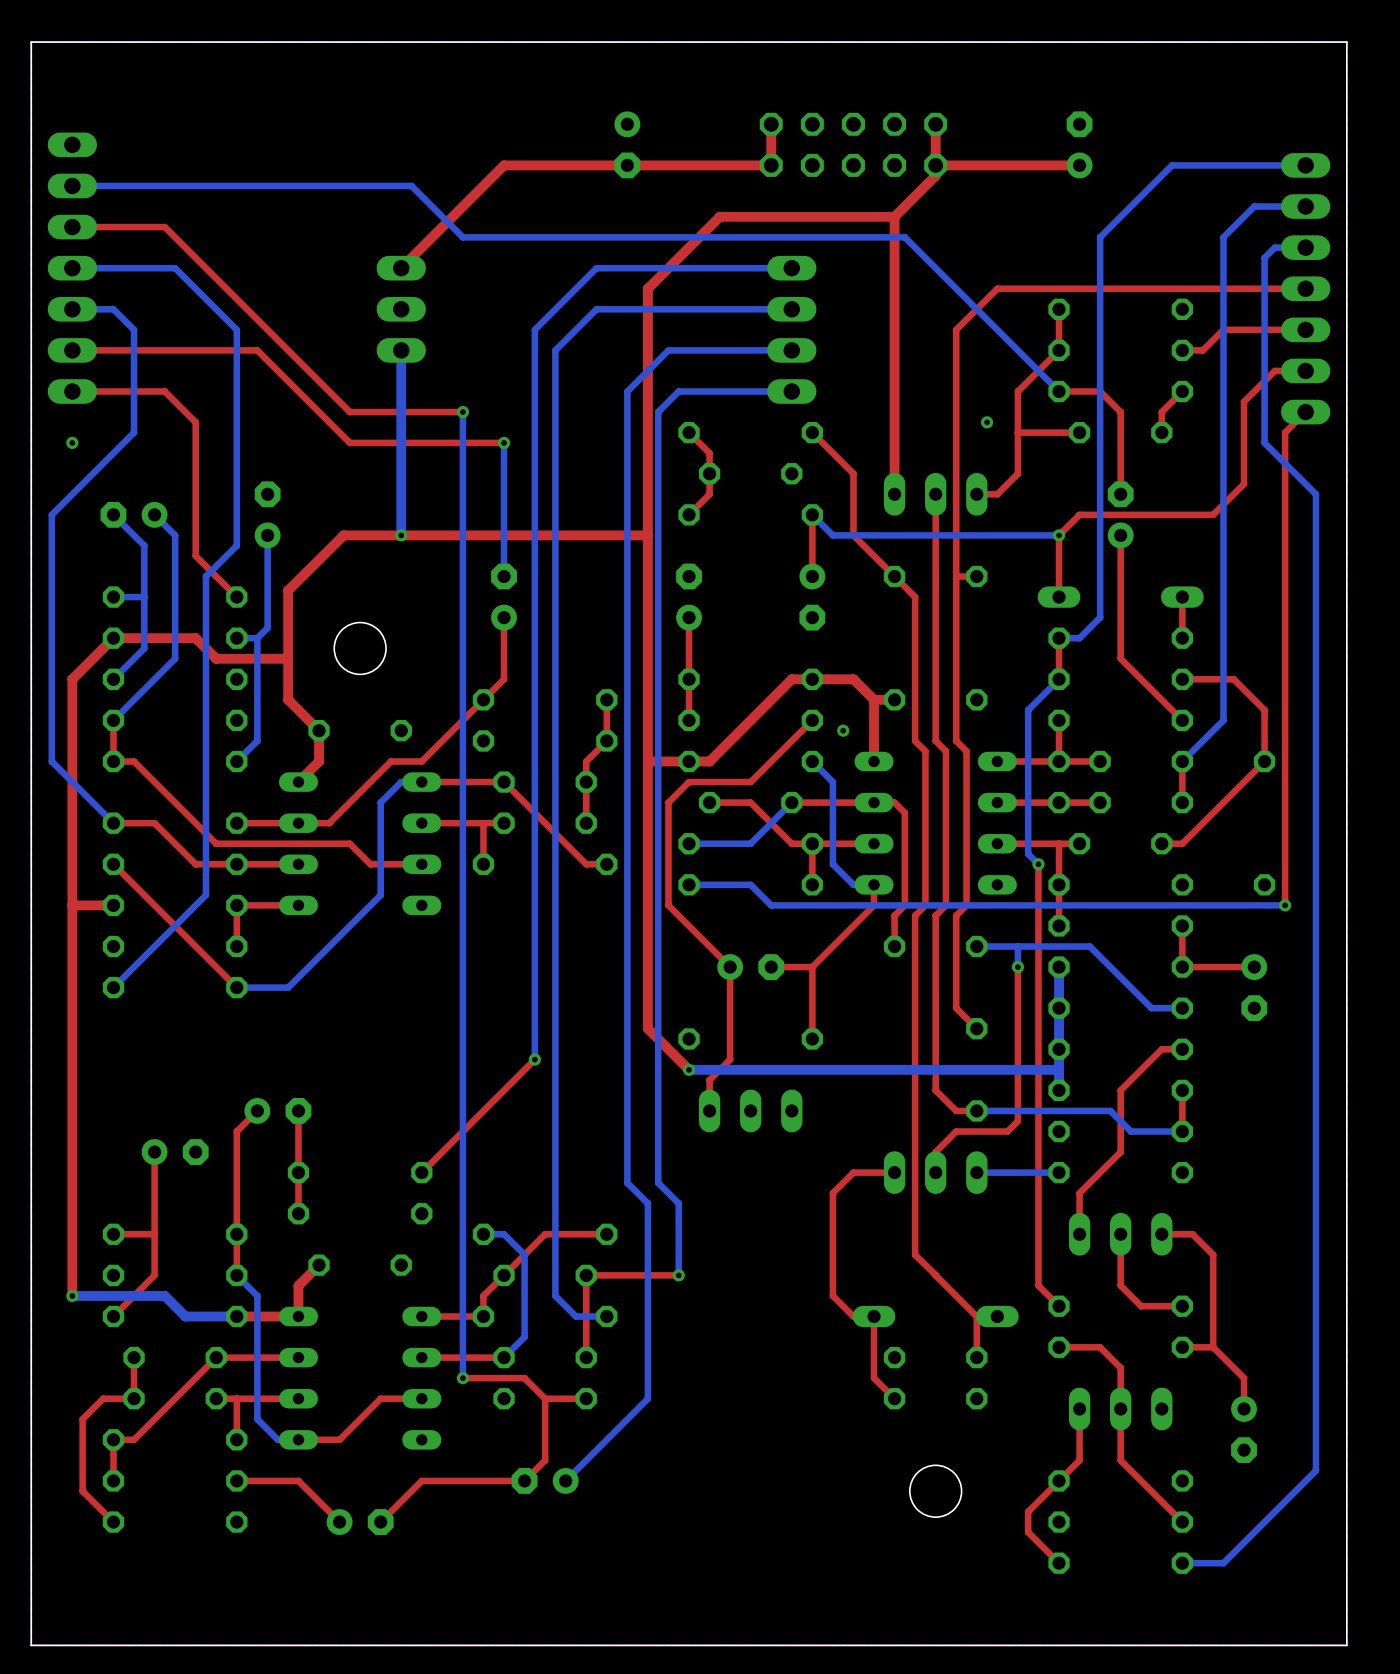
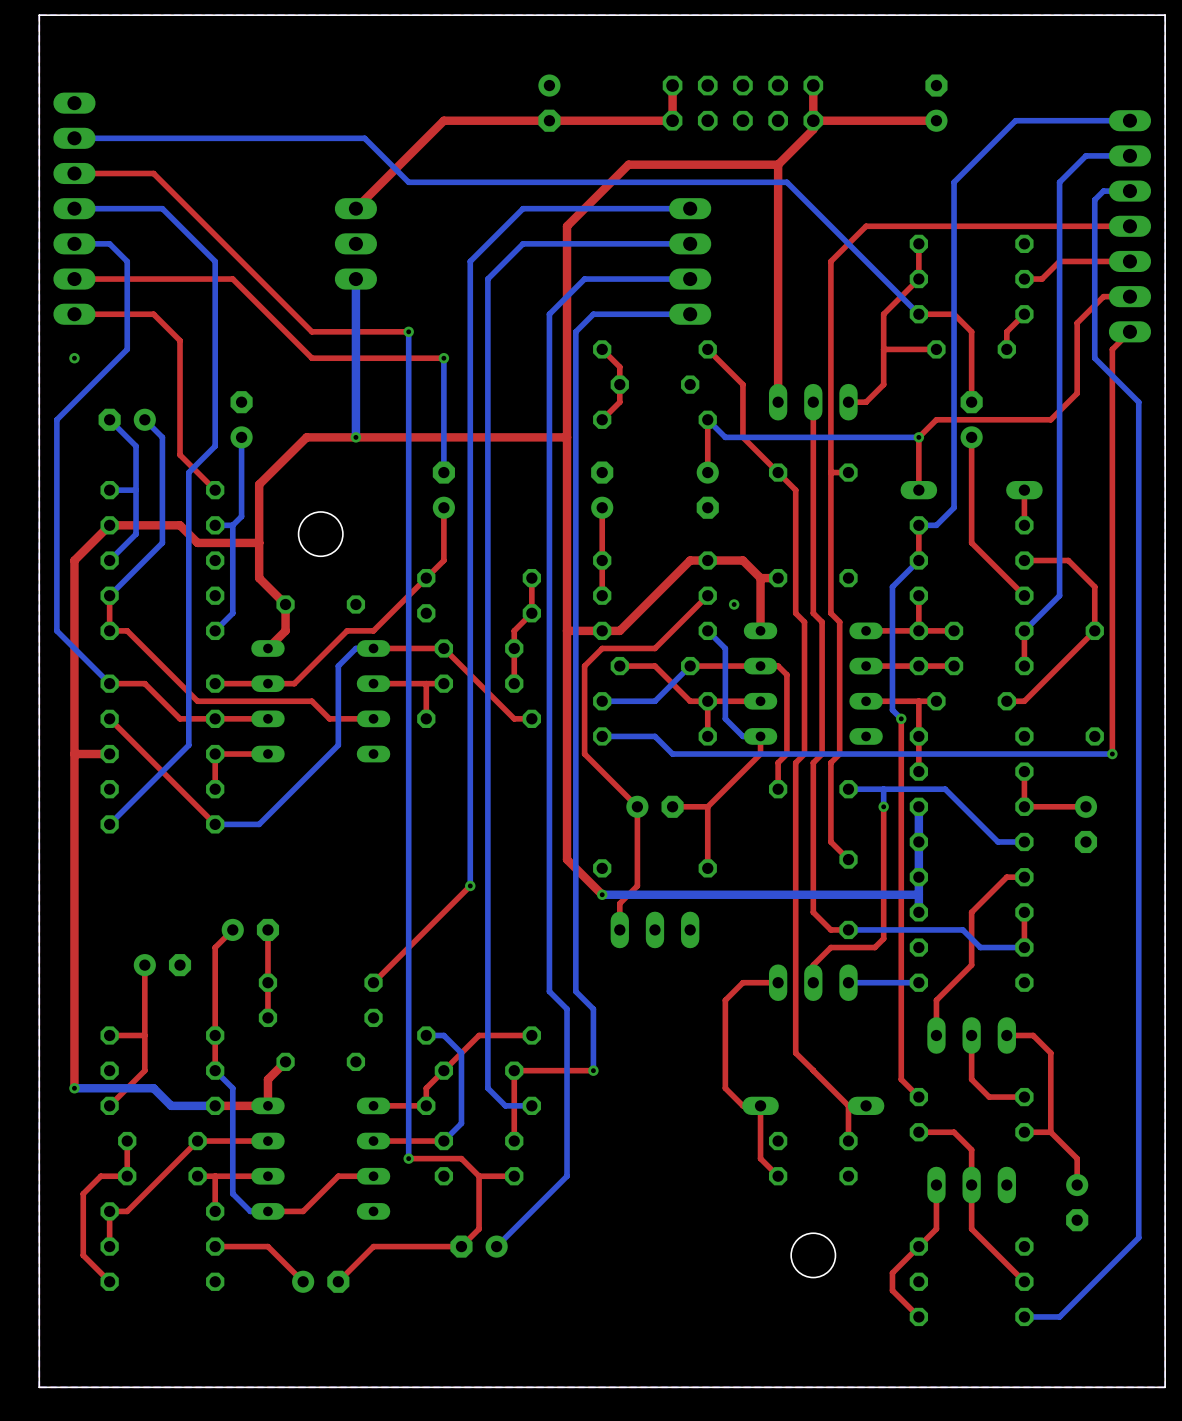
via: (987, 422) -> none

